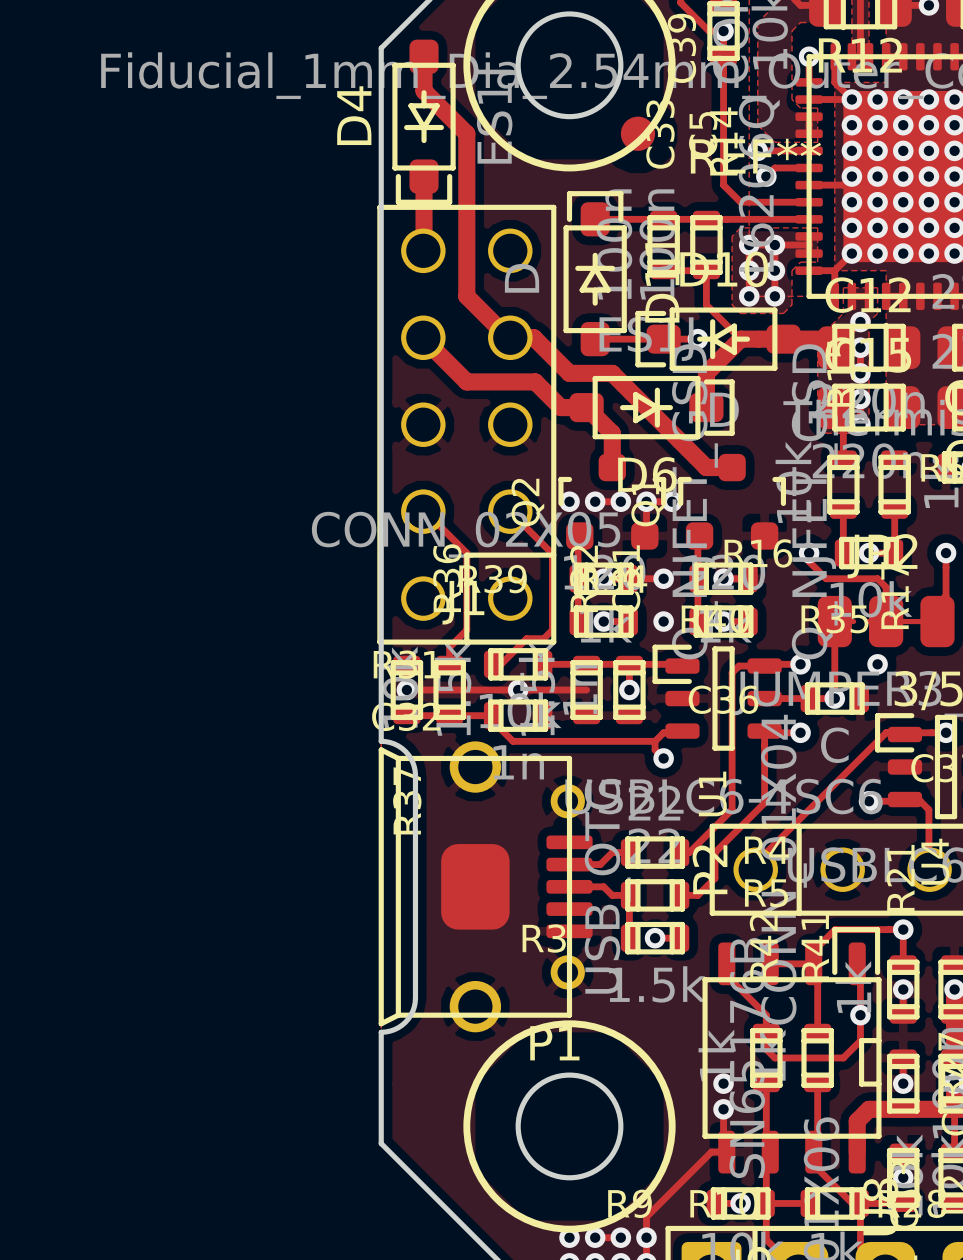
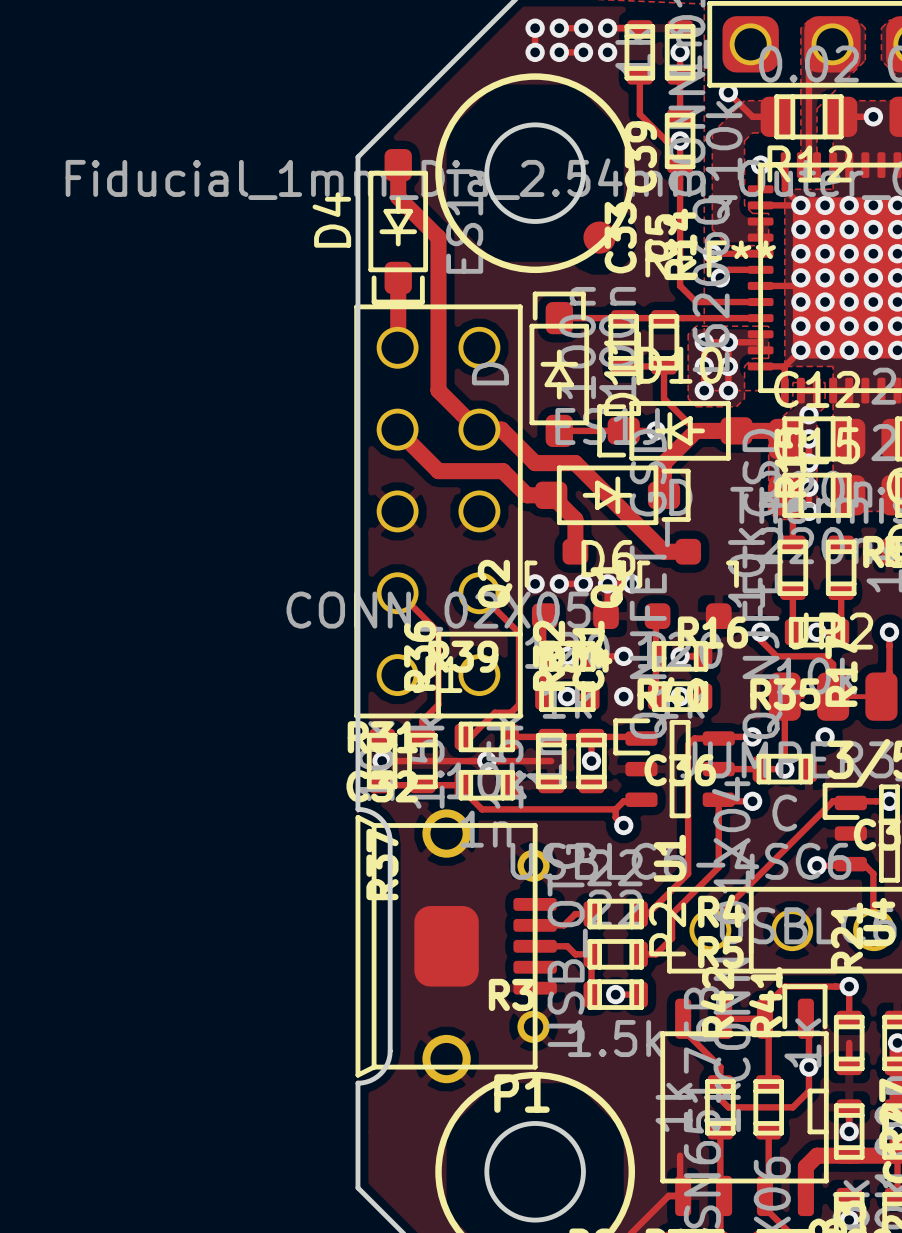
via: (903, 989) -> none
via: (723, 1083) -> none
via: (723, 1109) -> none

